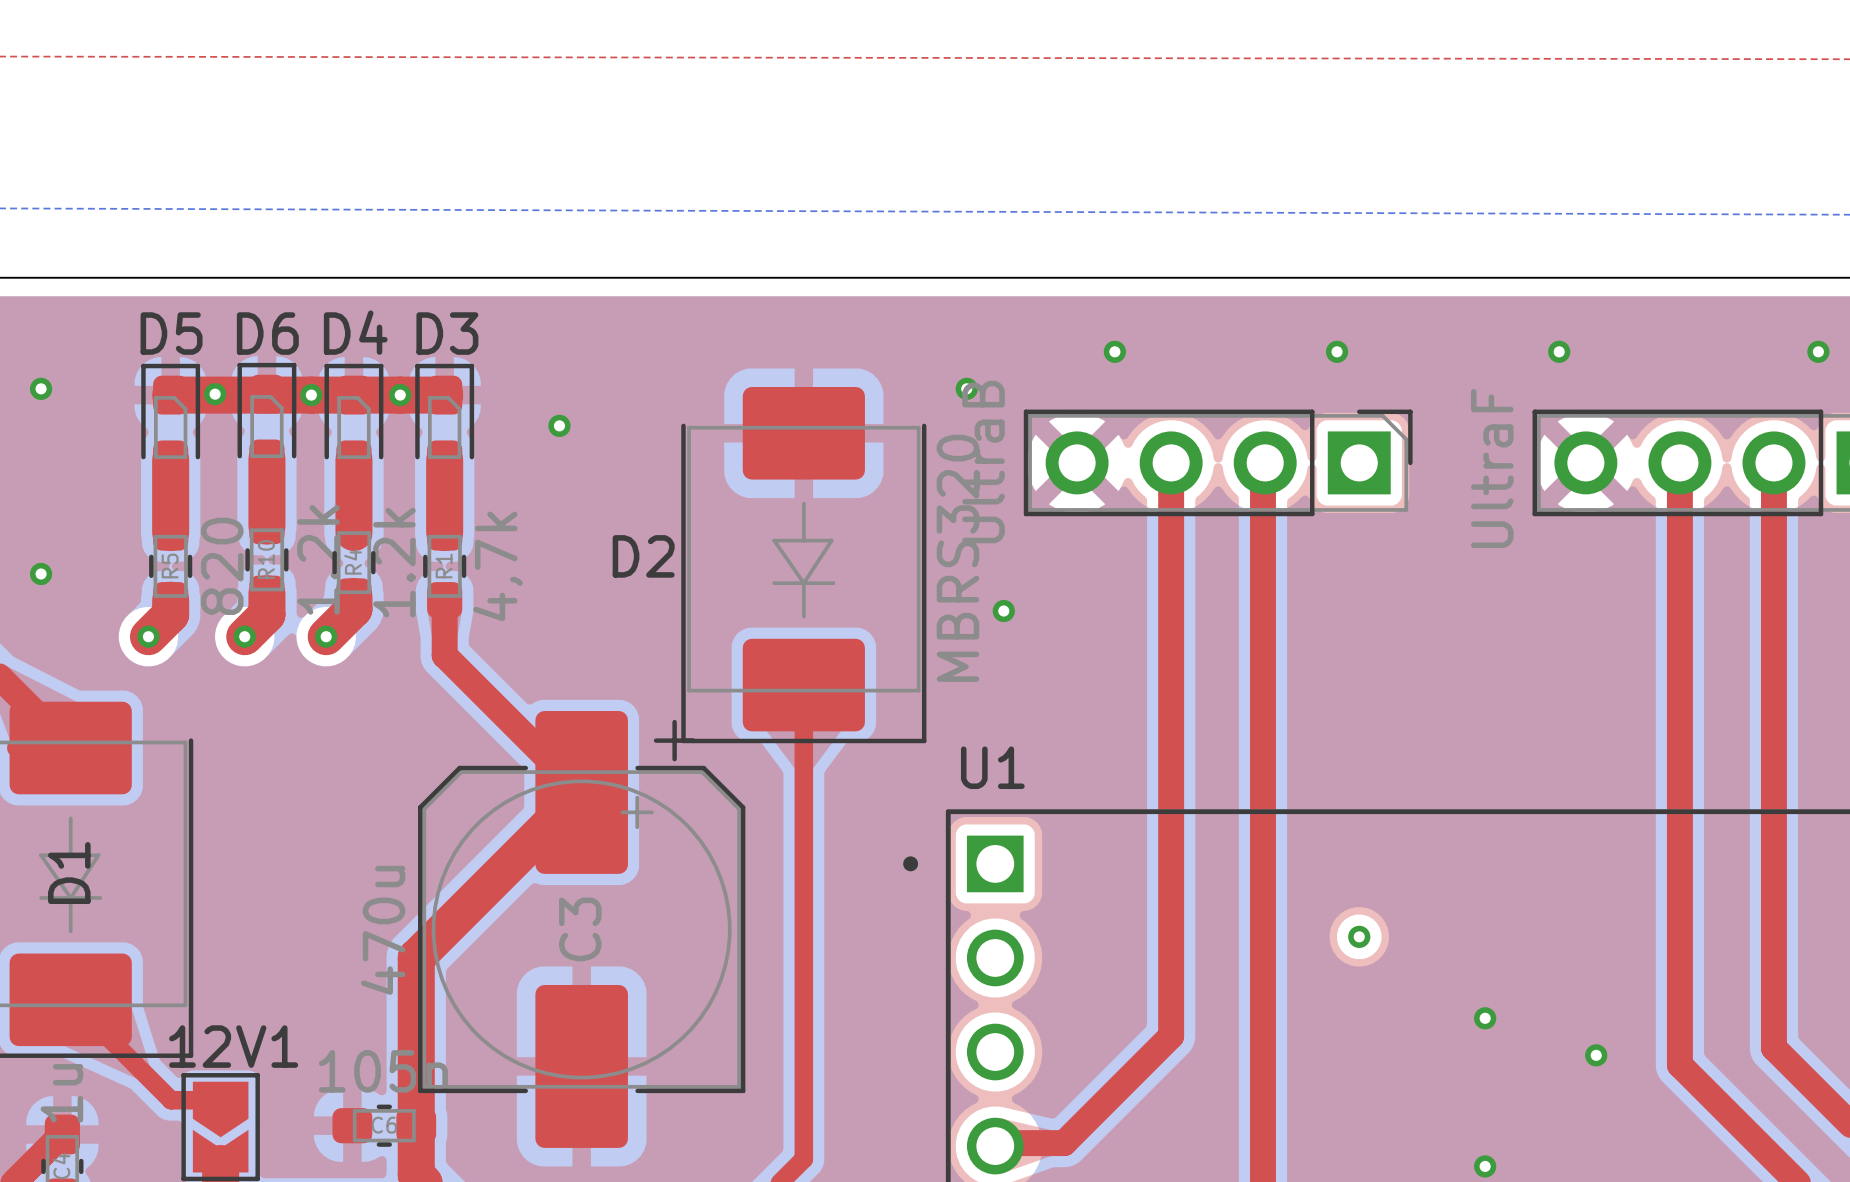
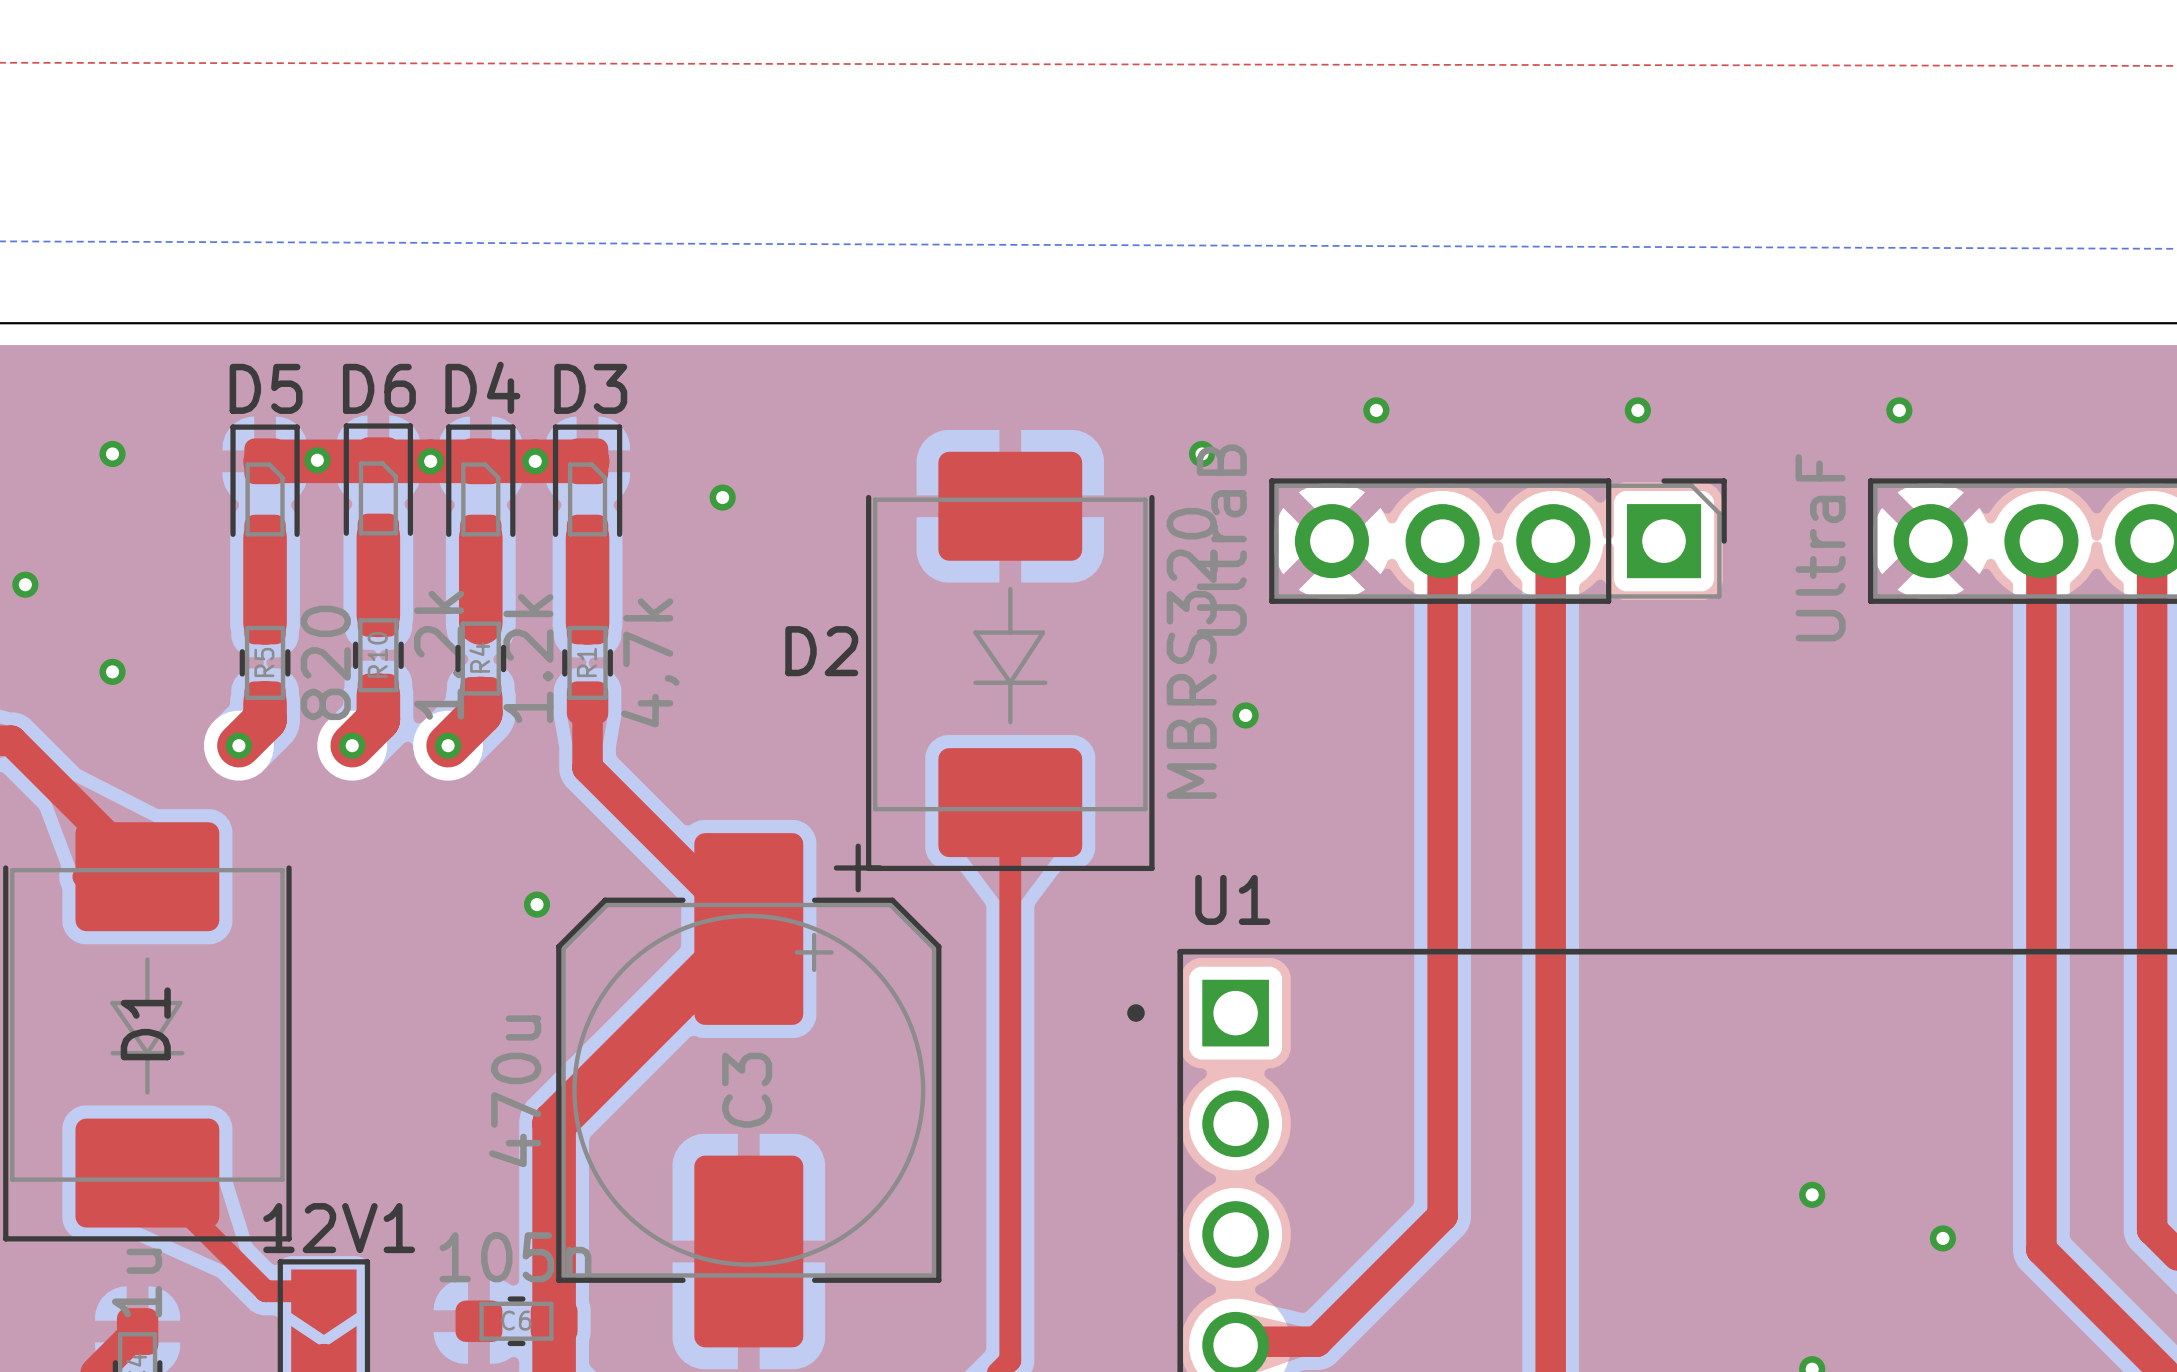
via: none -> (537, 904)
via: (1359, 936) -> none

